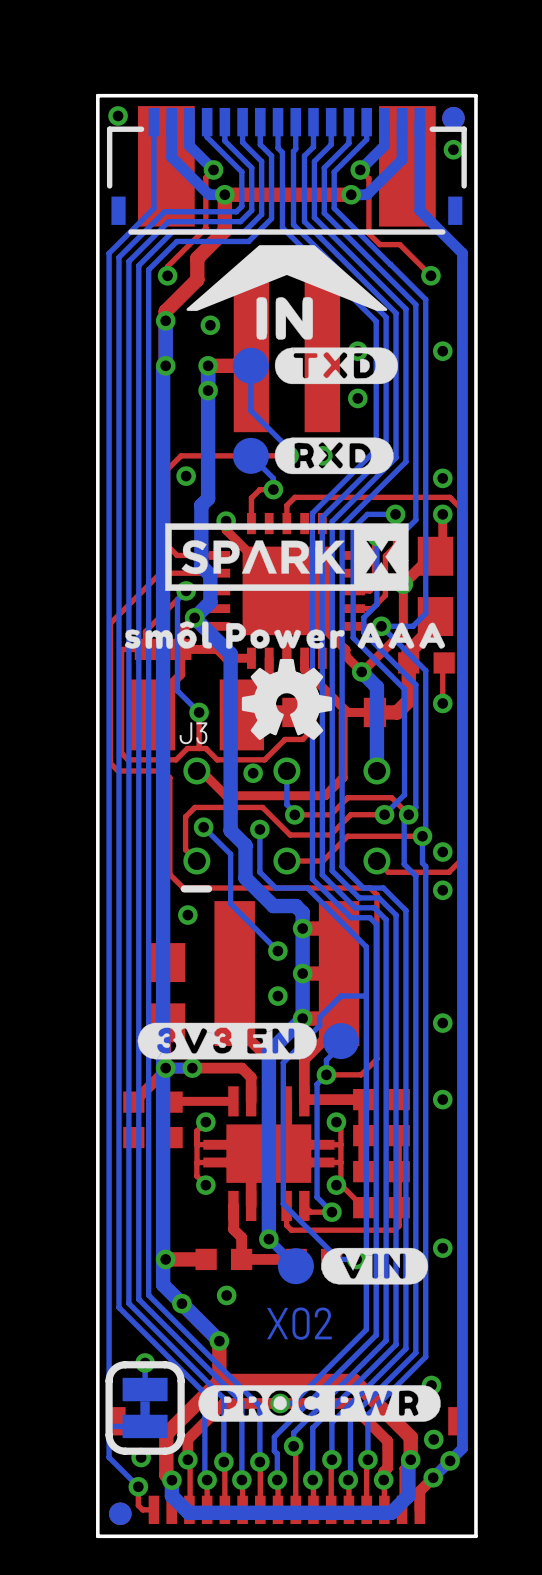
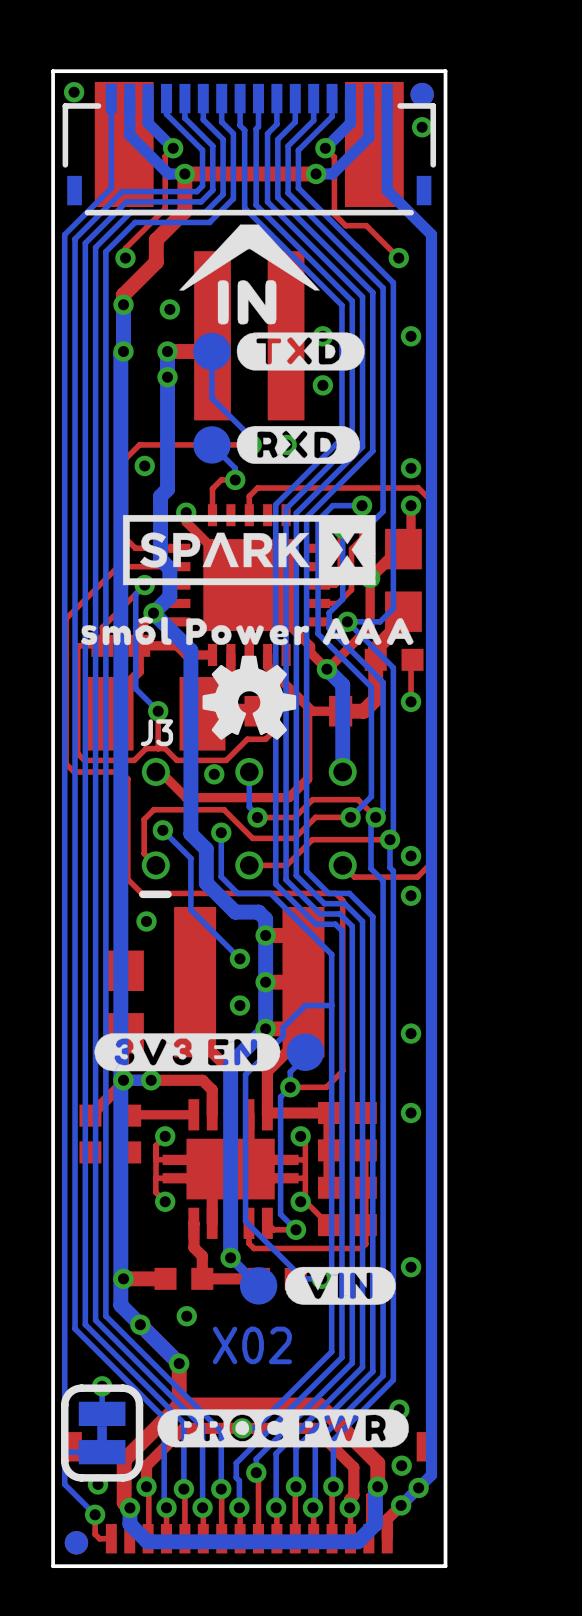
drawing shape: [186, 245, 388, 311] -> [179, 224, 320, 291]

